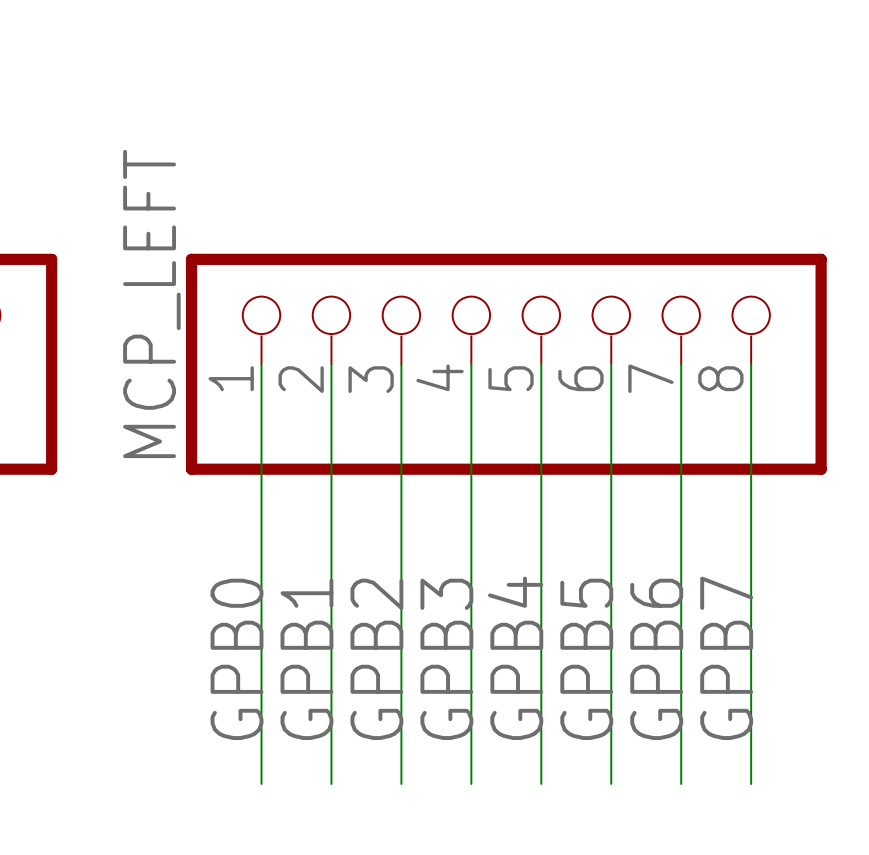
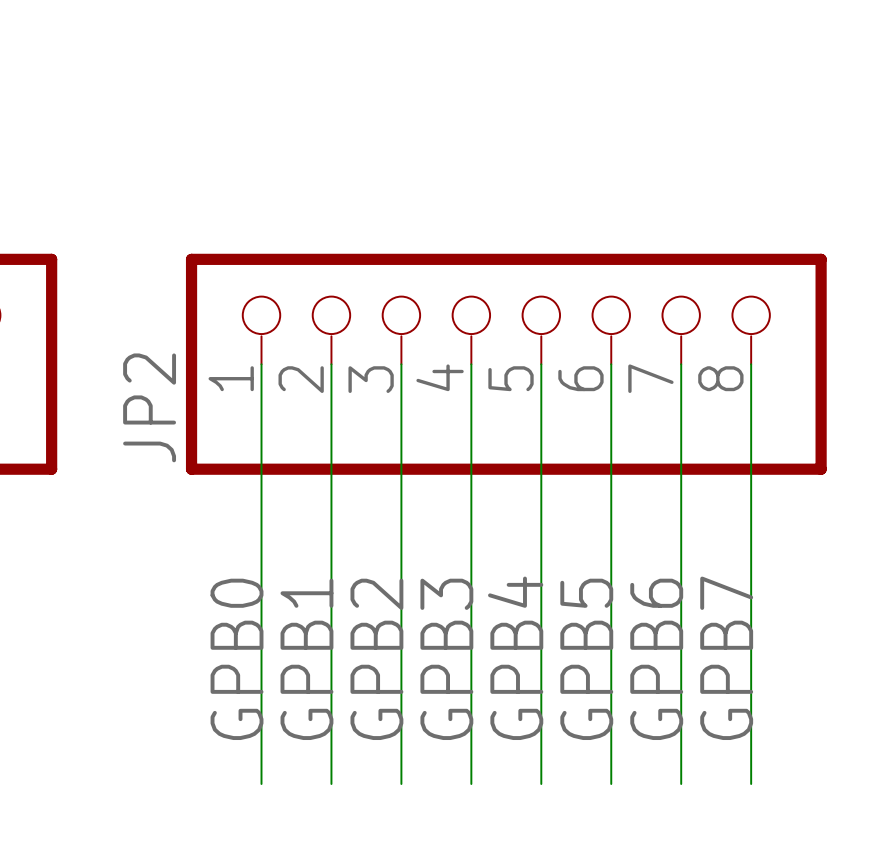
MCP_LEFT name: MCP_LEFT (151, 304) -> JP2 (149, 407)

